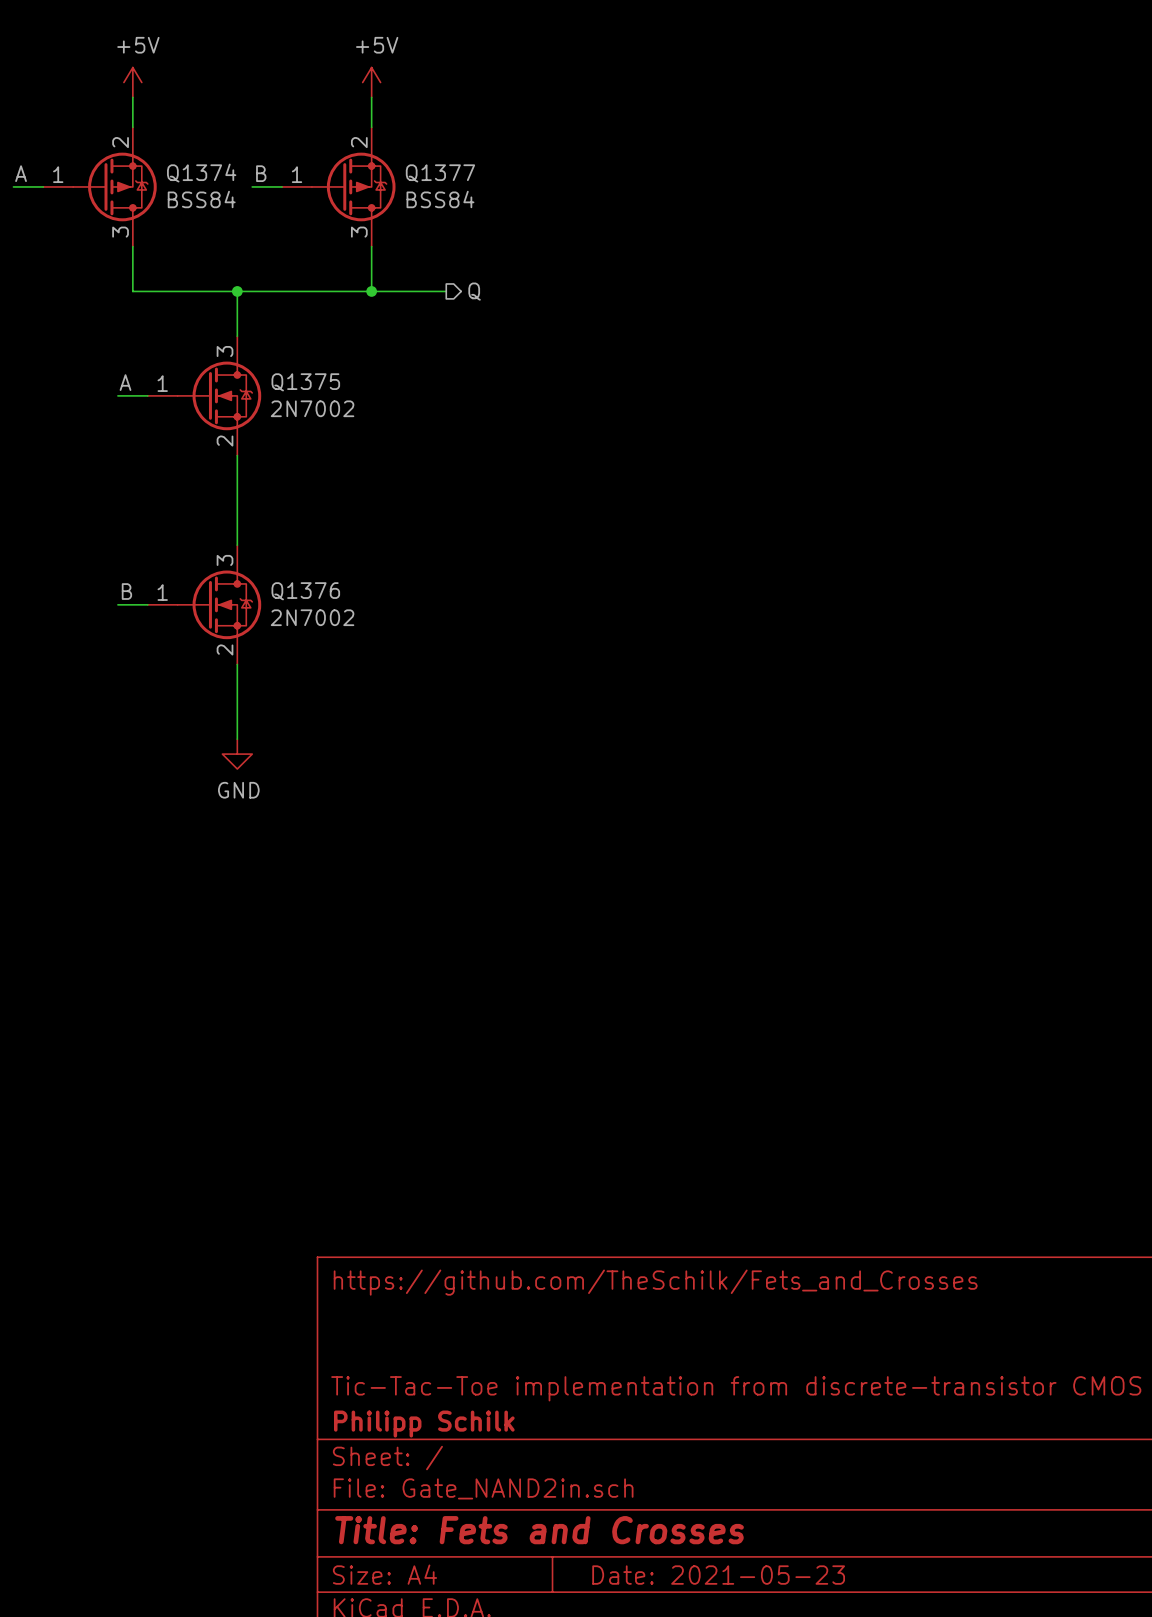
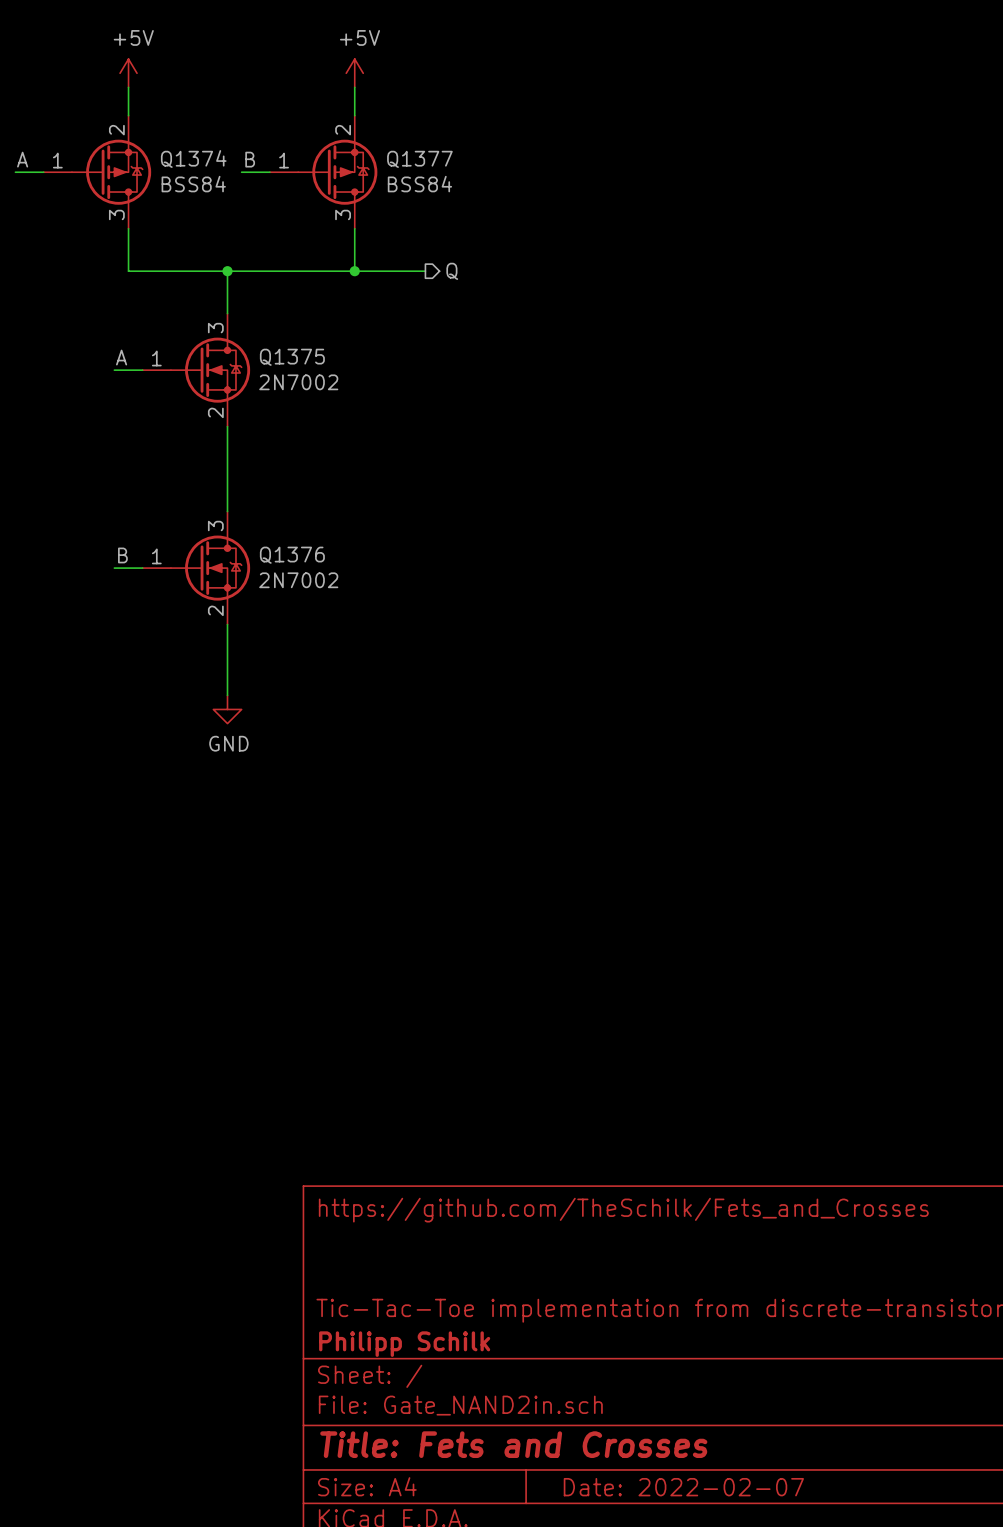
title block: Date: 2021-05-23 (718, 1575) -> Date: 2022-02-07 (683, 1487)

